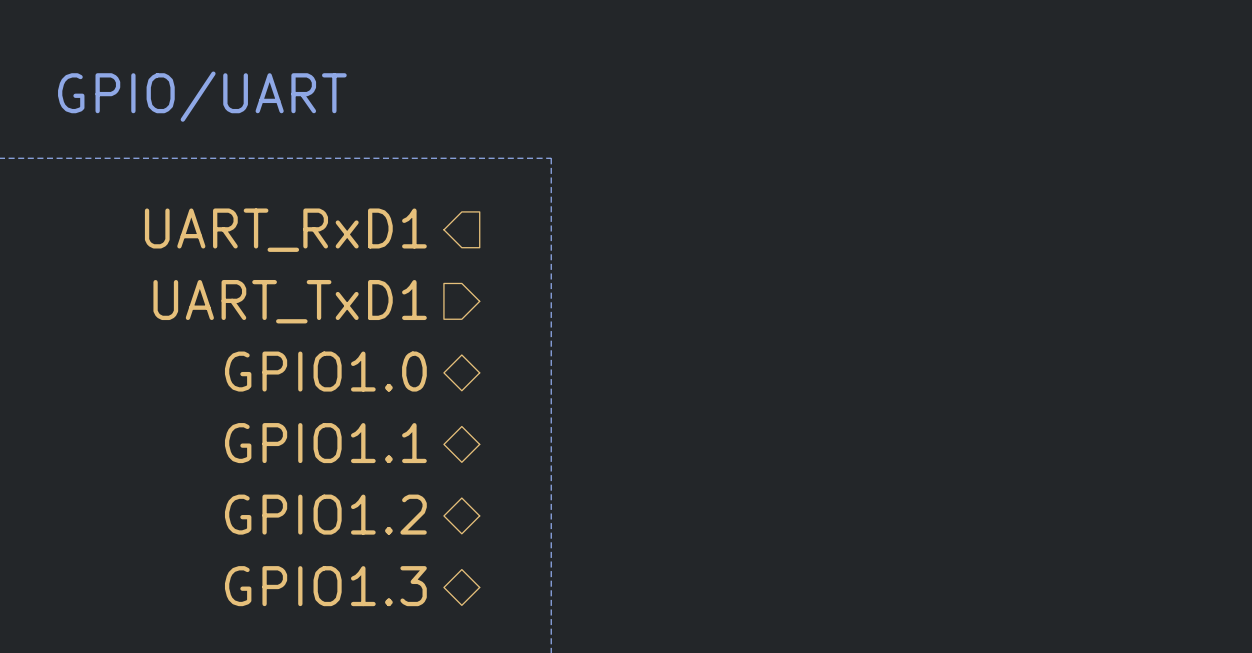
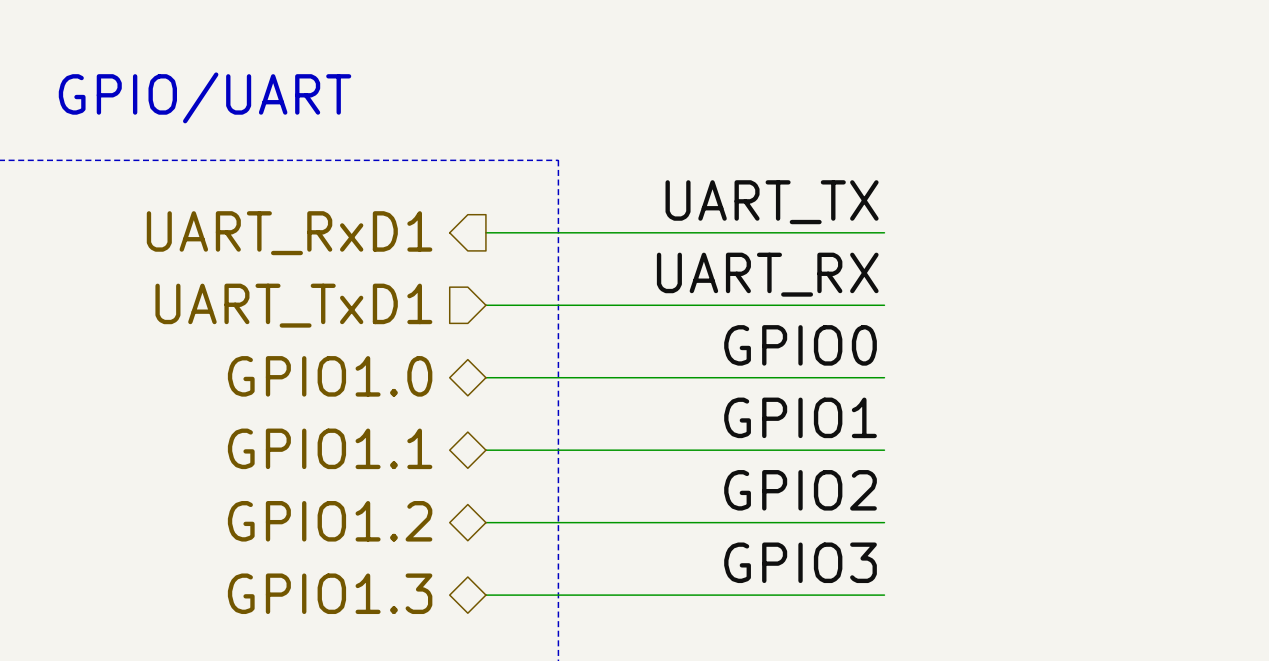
label: none -> UART_TX (772, 202)
wire: none -> (485, 232) (884, 232)
label: none -> UART_RX (767, 274)
wire: none -> (485, 305) (884, 305)
label: none -> GPIO0 (800, 345)
wire: none -> (485, 377) (884, 377)
label: none -> GPIO1 (800, 417)
wire: none -> (485, 450) (884, 450)
label: none -> GPIO2 (800, 490)
wire: none -> (485, 522) (884, 522)
label: none -> GPIO3 (800, 562)
wire: none -> (485, 595) (884, 595)

